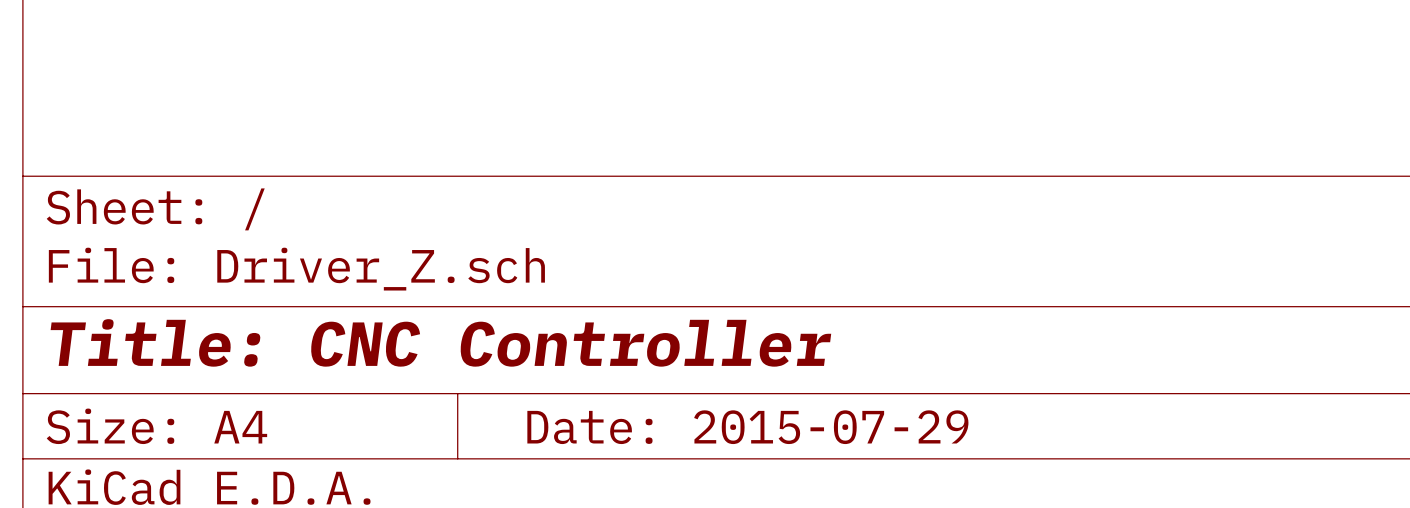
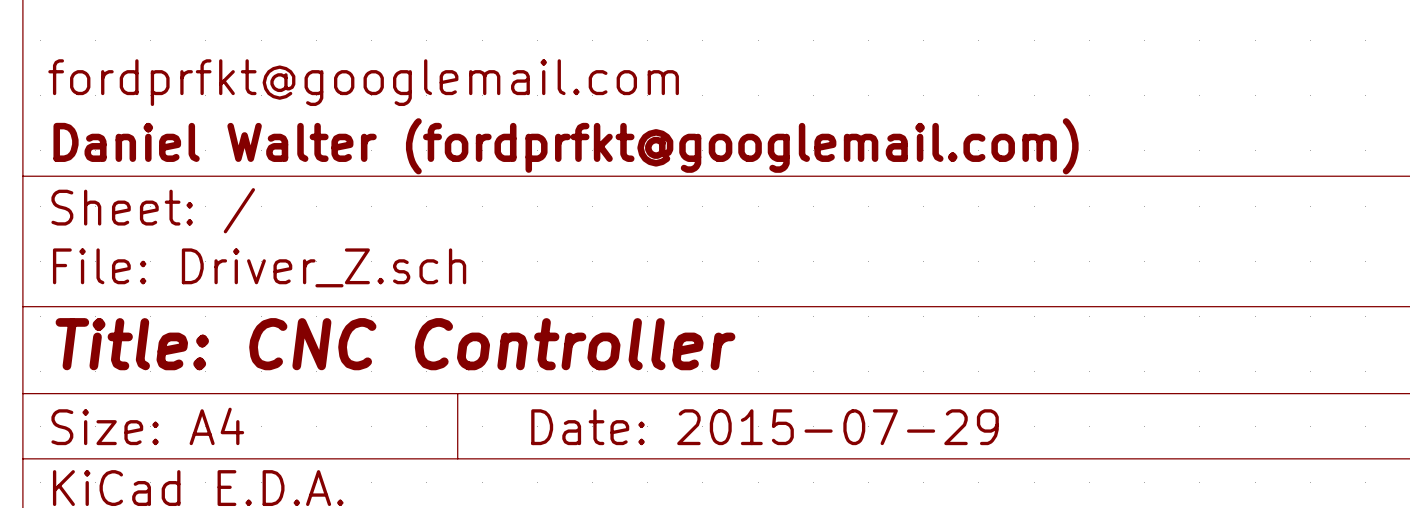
title block: none -> fordprfkt@googlemail.com (363, 82)
title block: none -> Daniel Walter (fordprfkt@googlemail.com) (566, 146)

